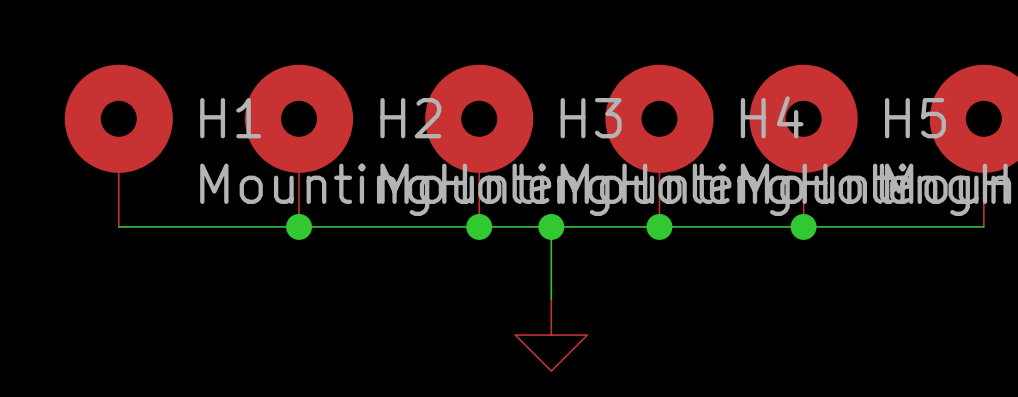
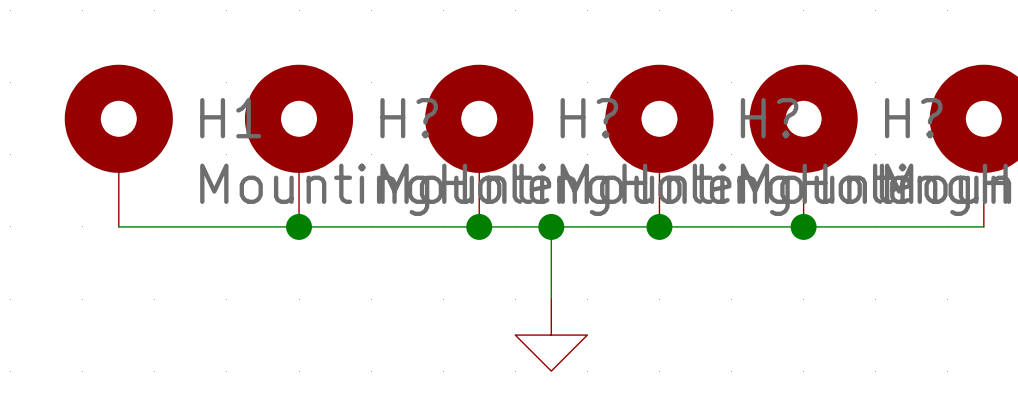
H4 name: H4 (772, 117) -> H? (769, 118)
H2 name: H2 (410, 118) -> H? (409, 118)
H3 name: H3 (591, 118) -> H? (589, 118)
H5 name: H5 (915, 118) -> H? (913, 118)

